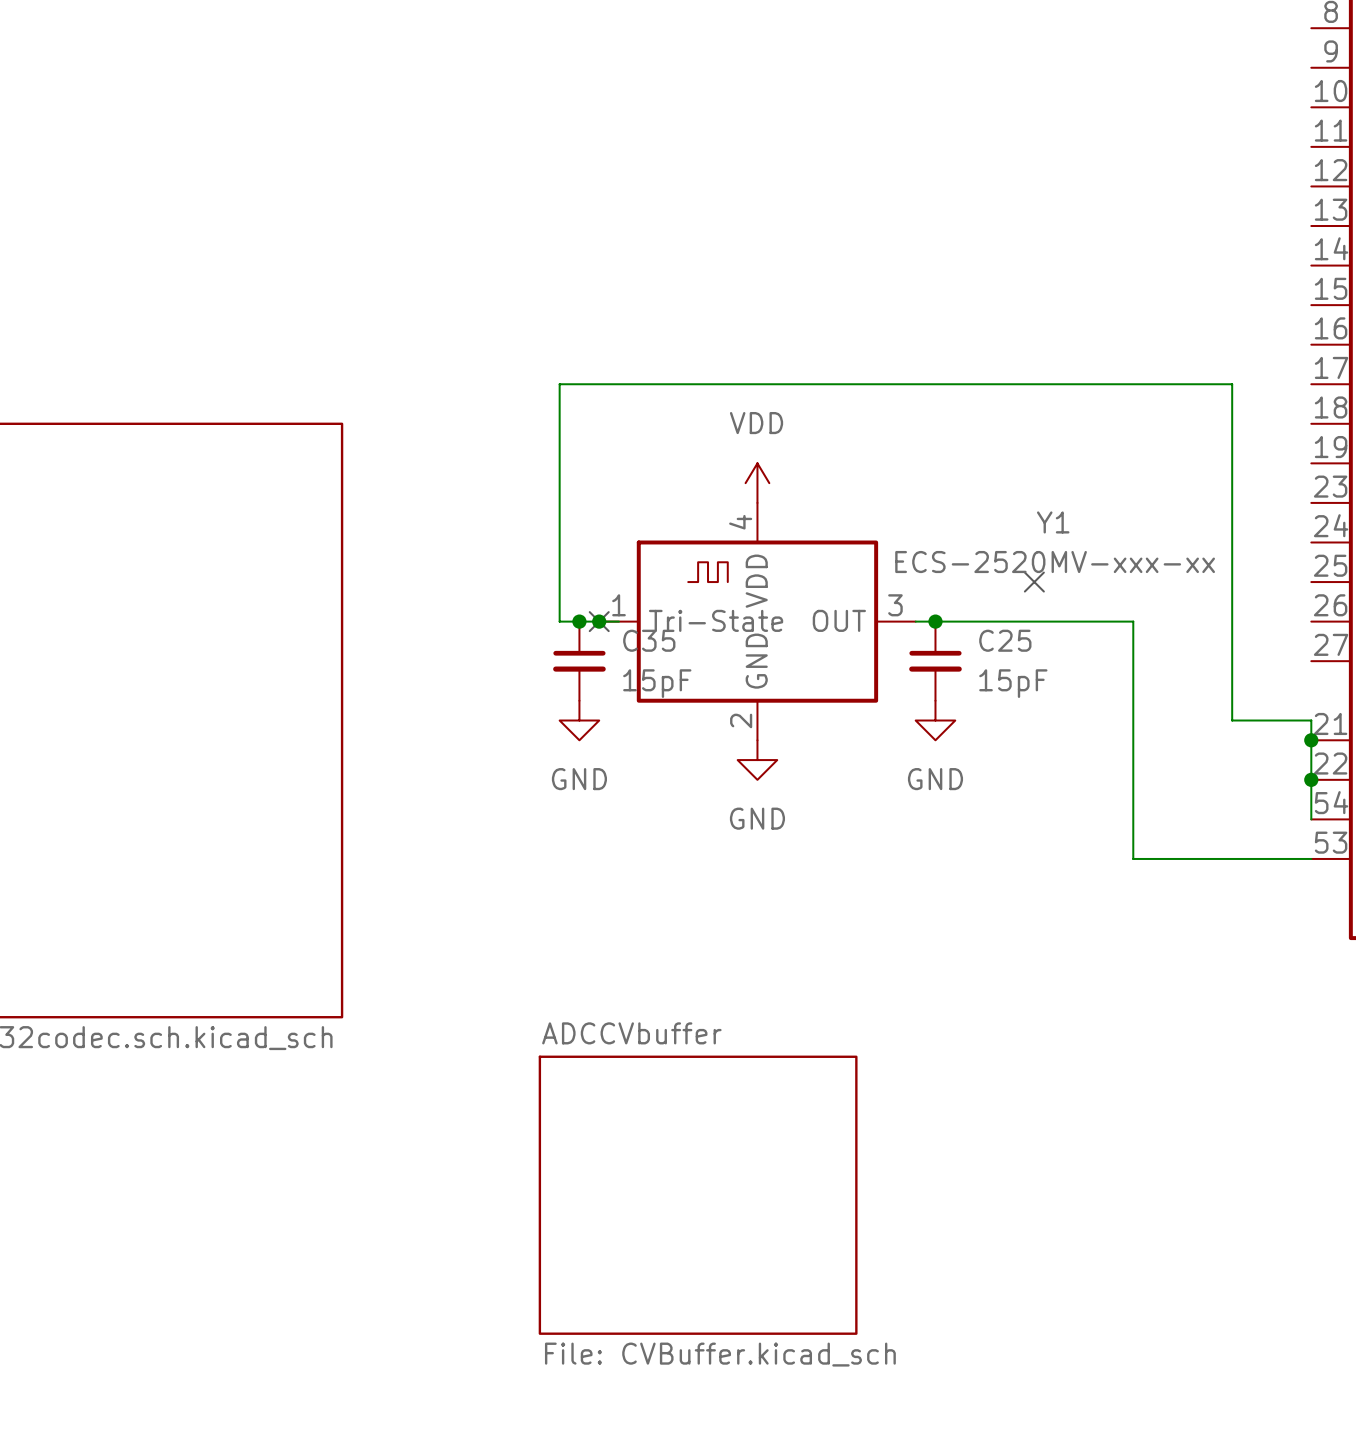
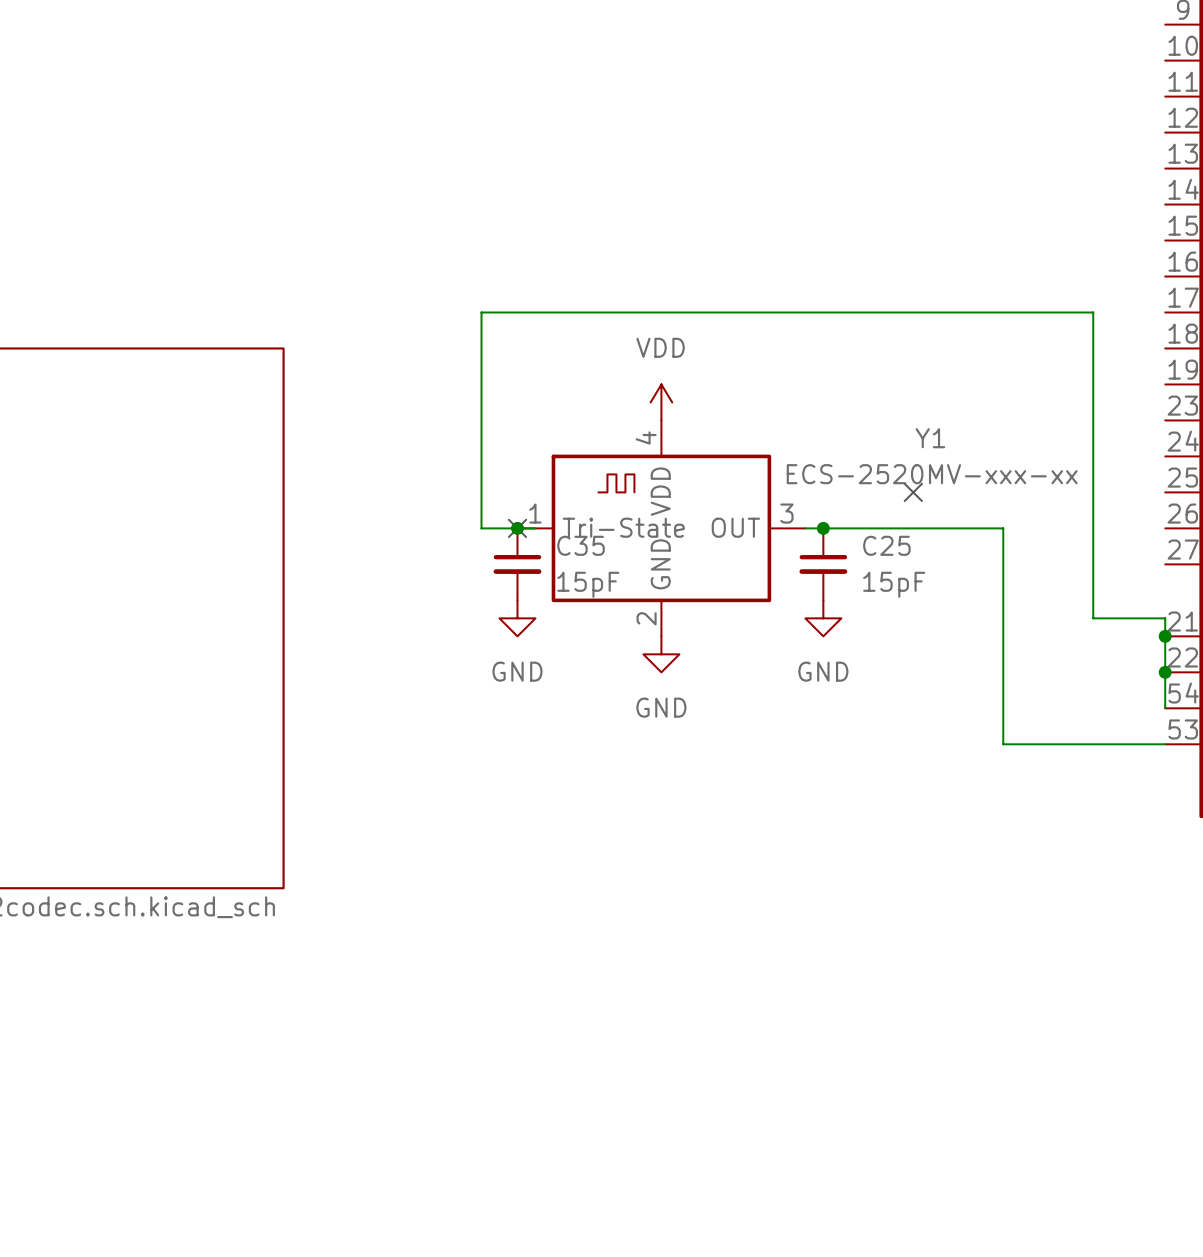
junction: (579, 621) -> none
C35 position: (579, 661) -> (517, 564)
power symbol position: GND (579, 720) -> GND (517, 618)
sheet ADCCVbuffer: File: CVBuffer.kicad_sch (698, 1195) -> none

